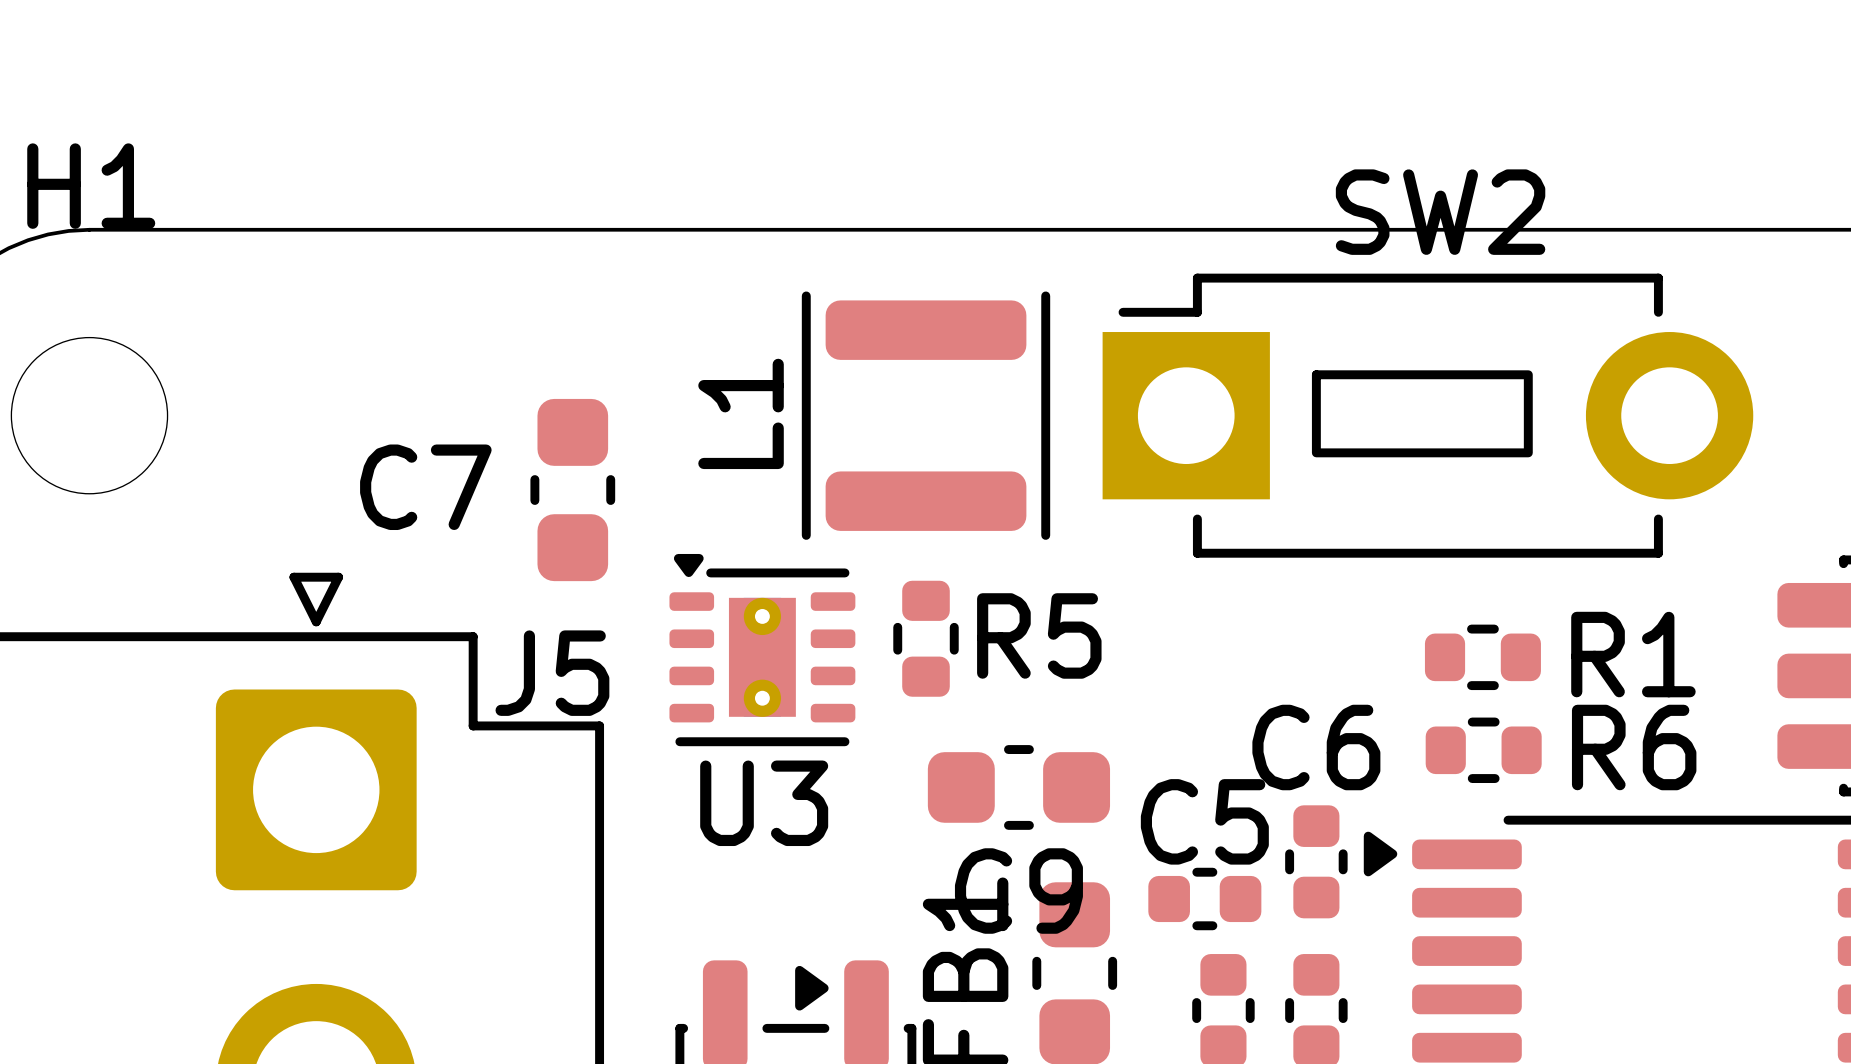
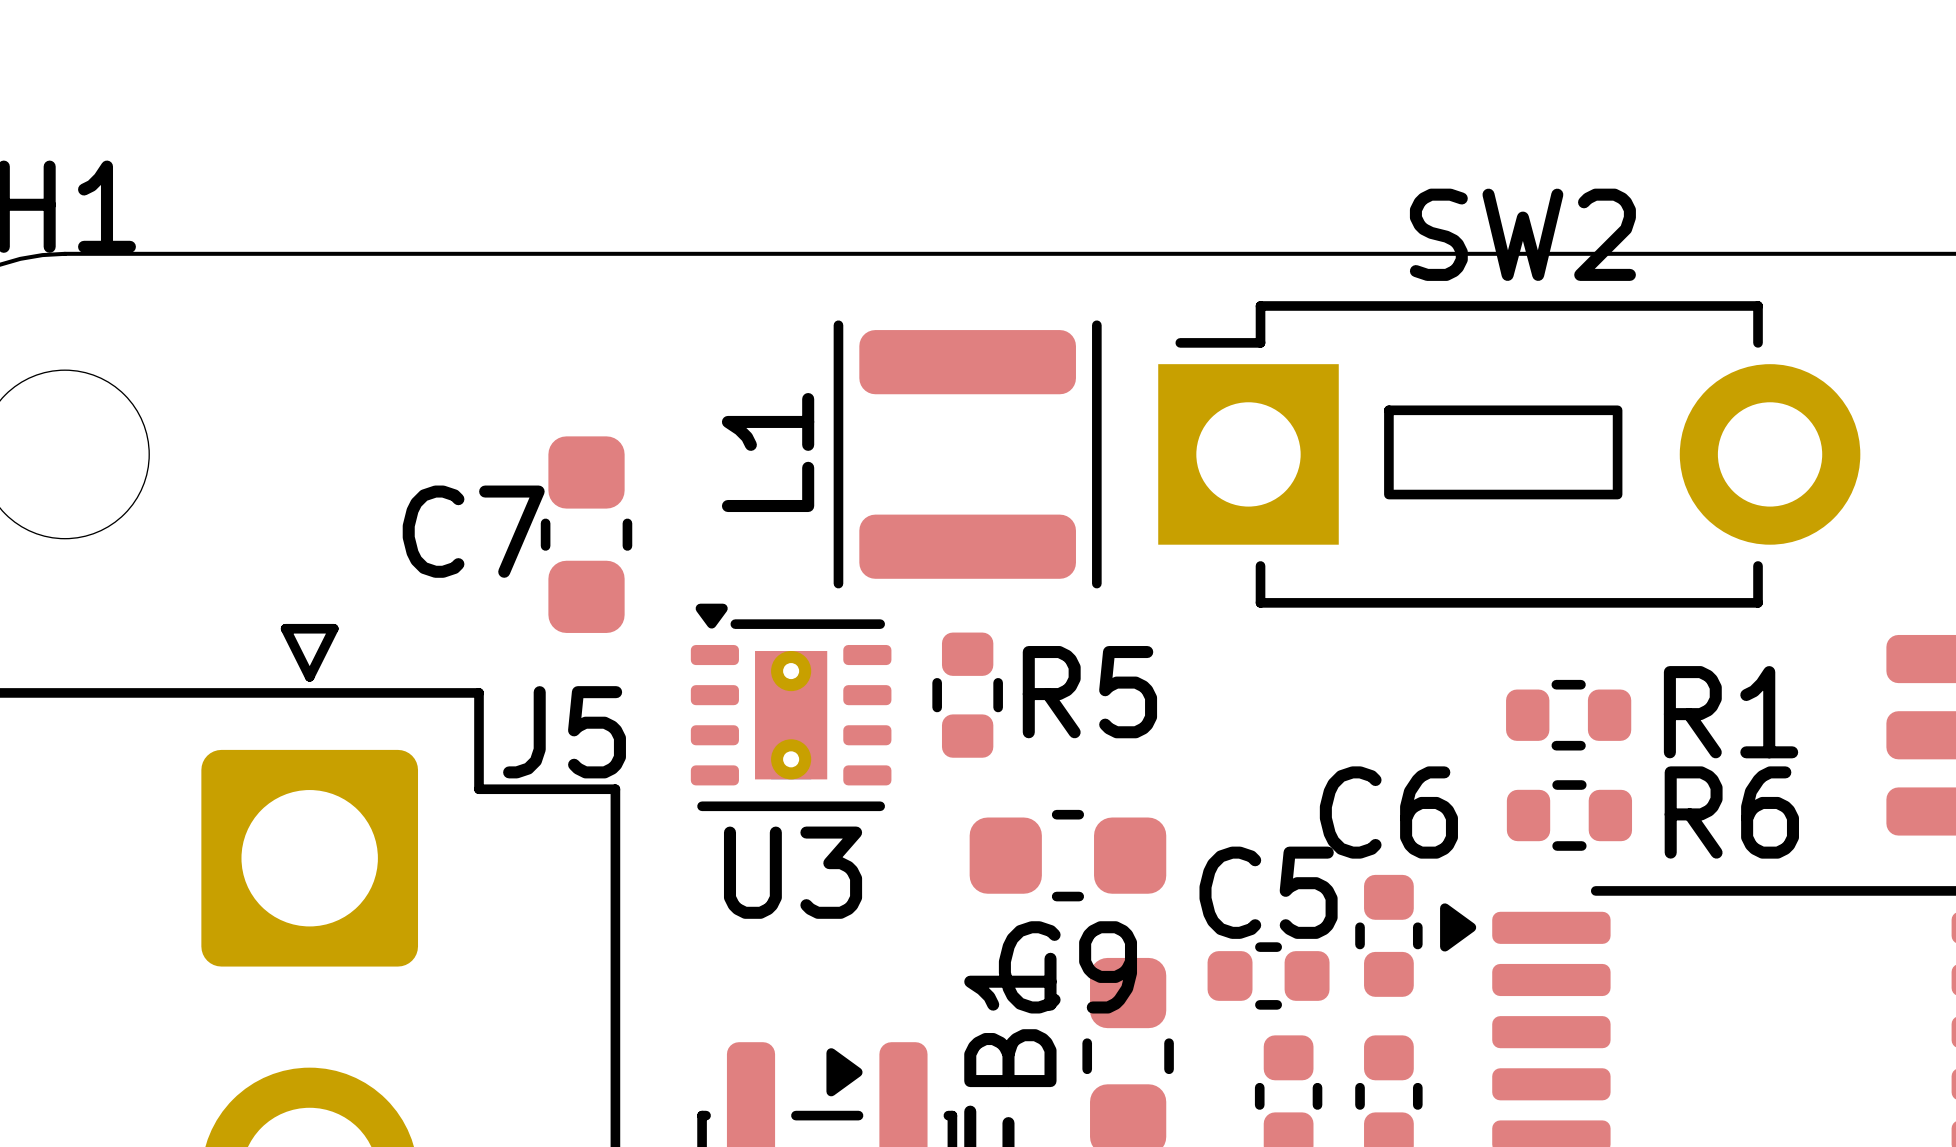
C7 name position: C7 (425, 487) -> C7 (473, 531)

